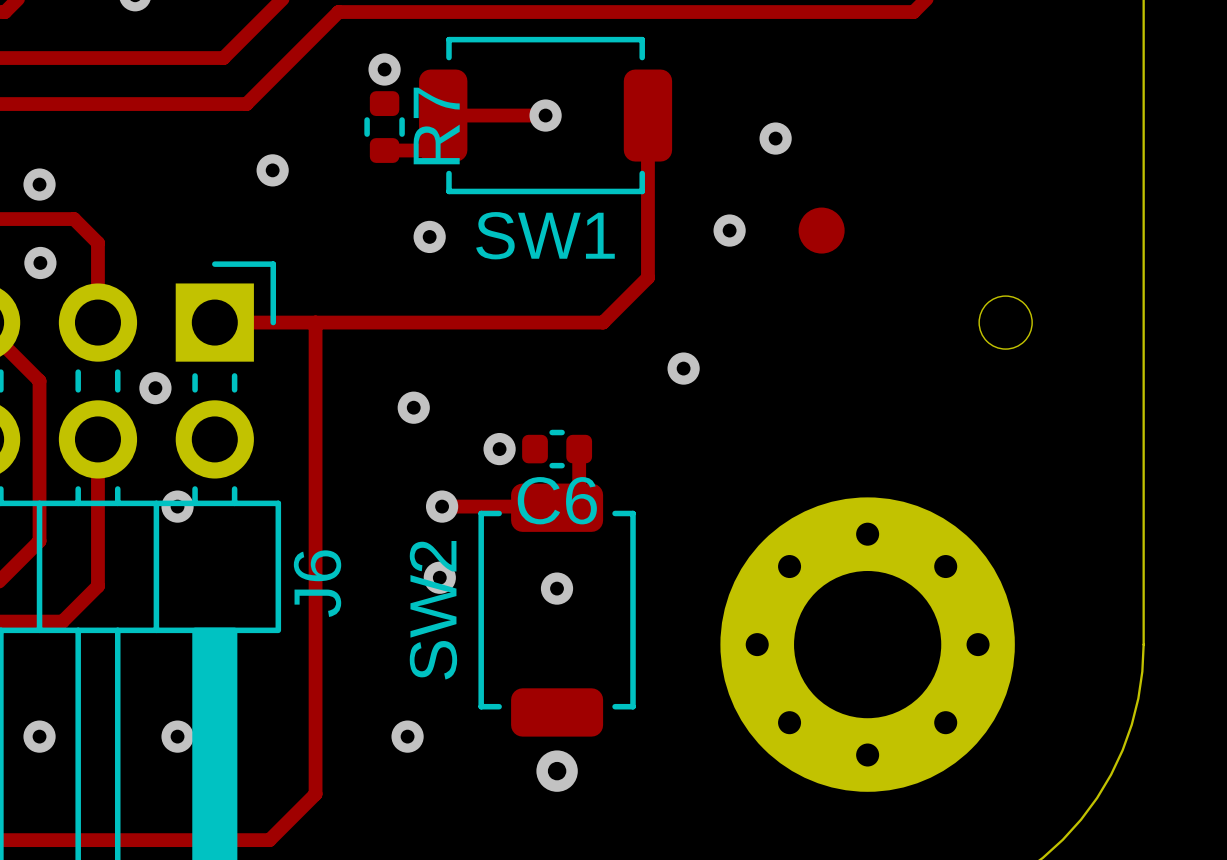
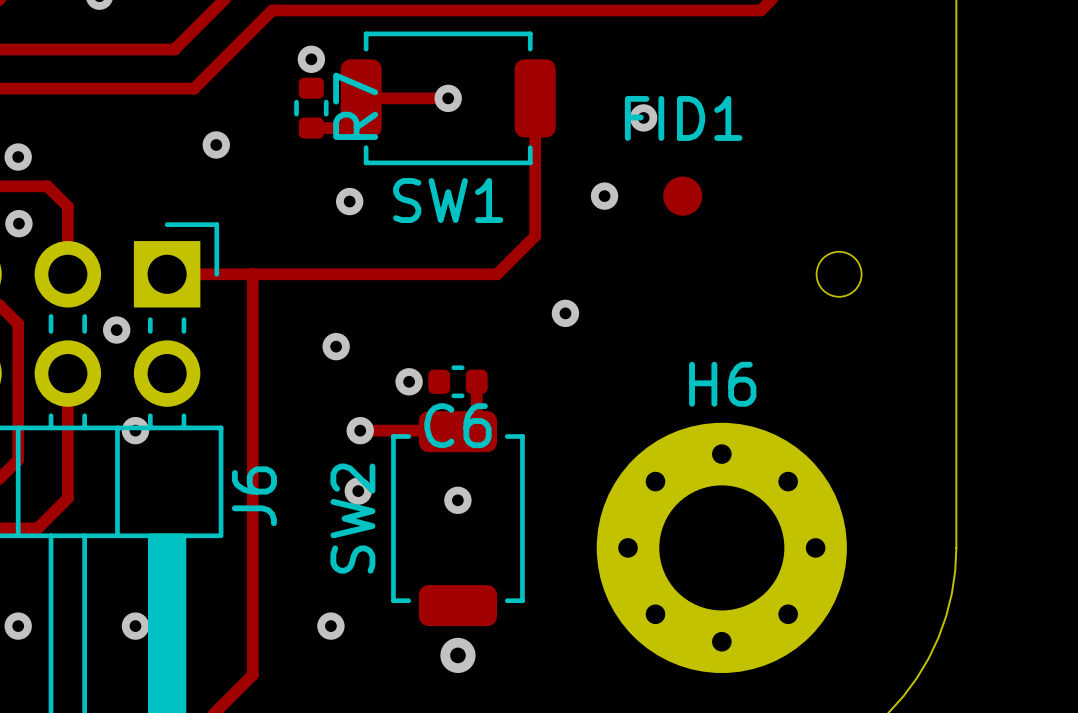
FID1 name: none -> FID1 (683, 118)
H6 name: none -> H6 (722, 384)

